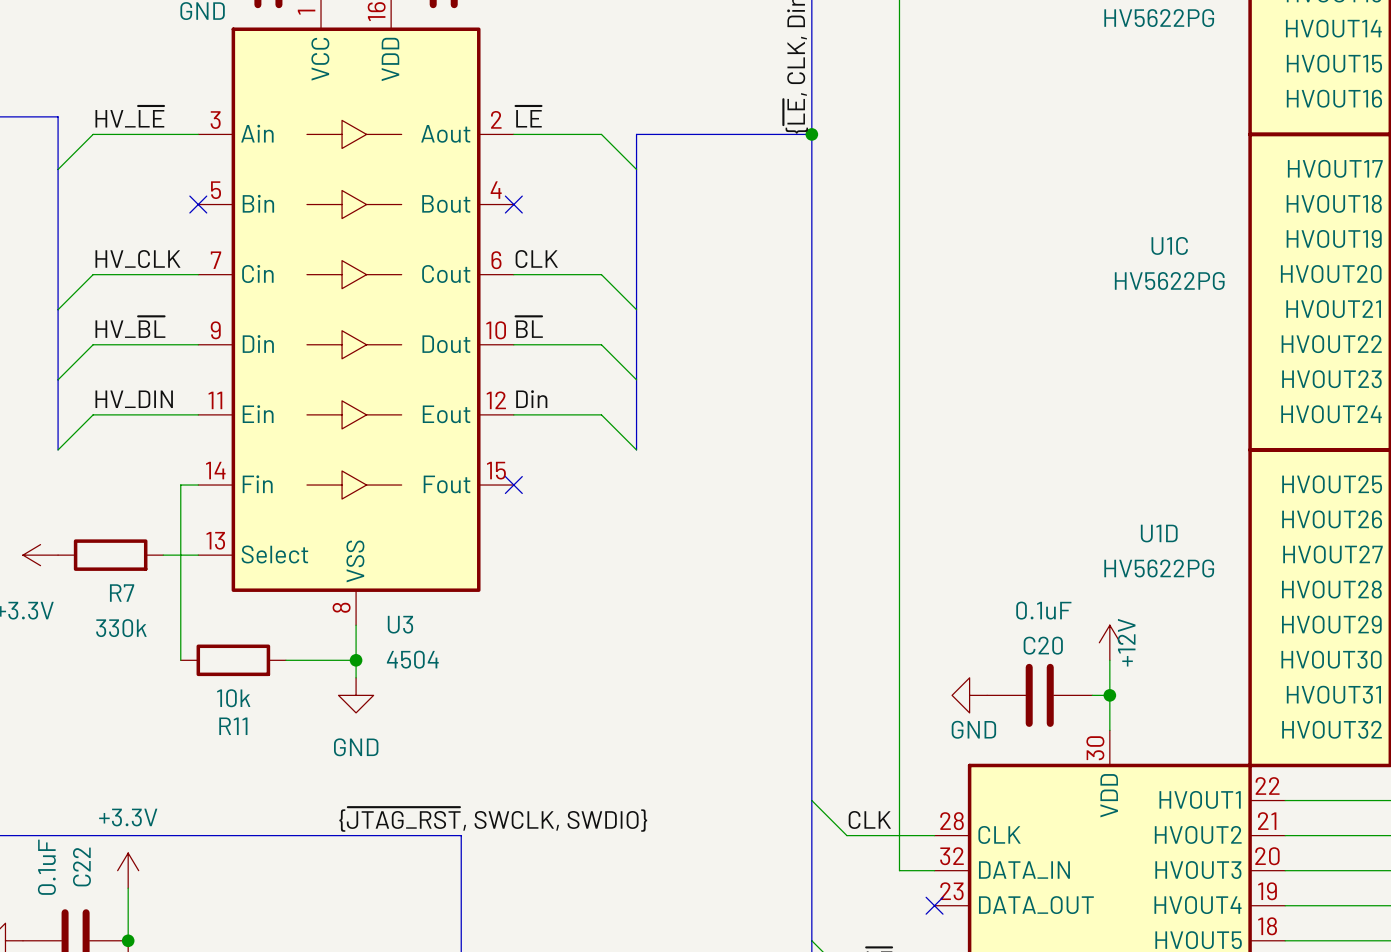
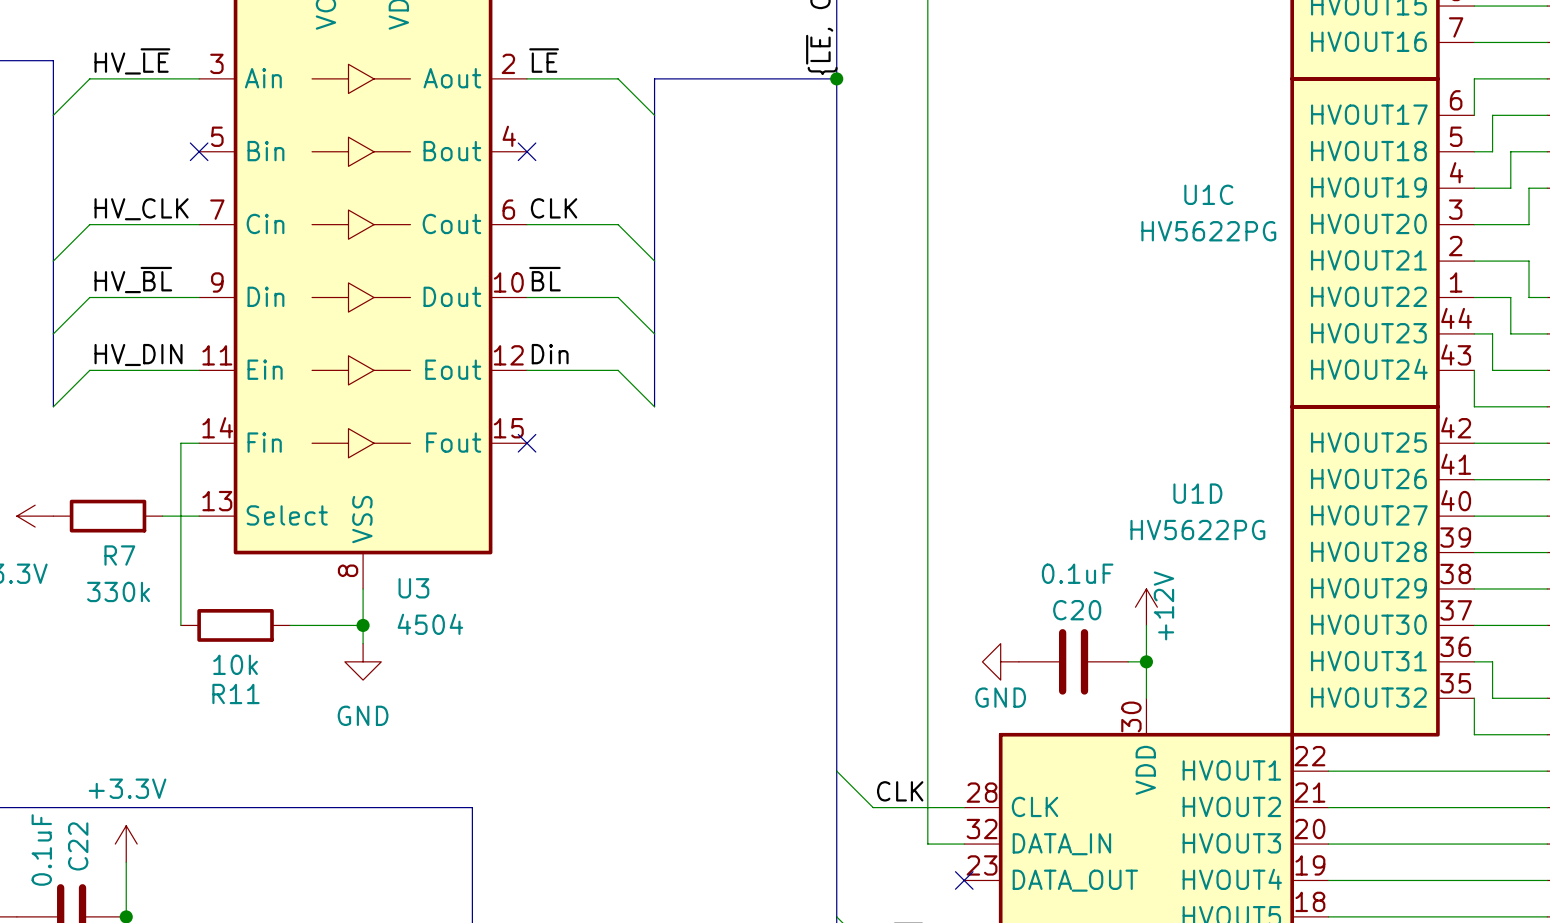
label: {~{JTAG_RST}, SWCLK, SWDIO} (493, 819) -> none

